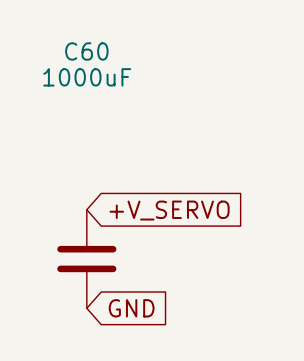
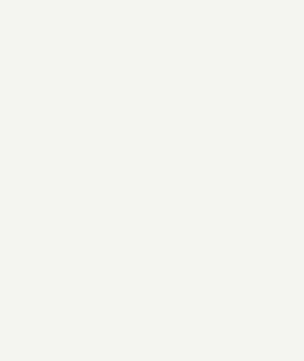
global label: +V_SERVO (169, 210) -> none
C60: 1000uF (86, 259) -> none
global label: GND (131, 308) -> none

